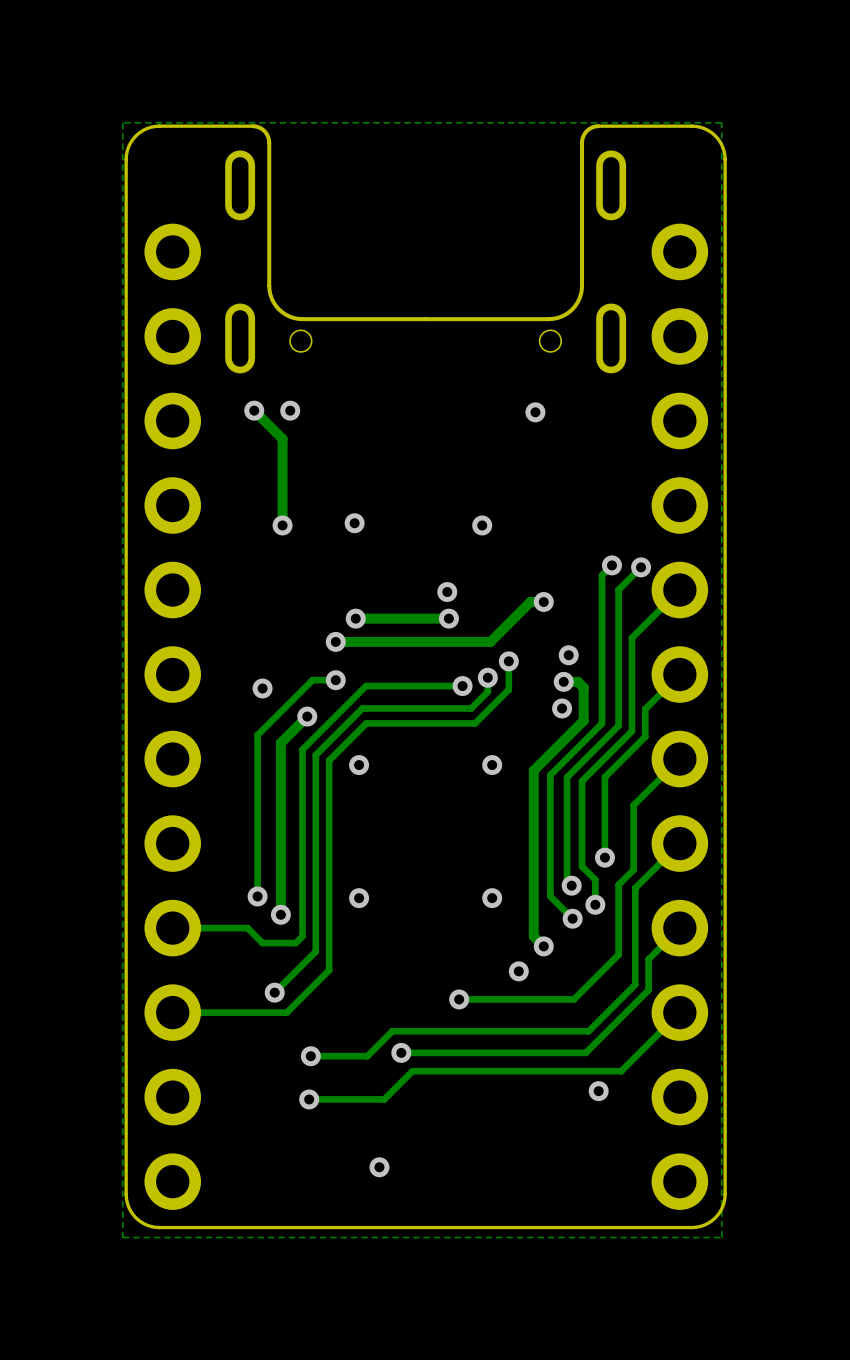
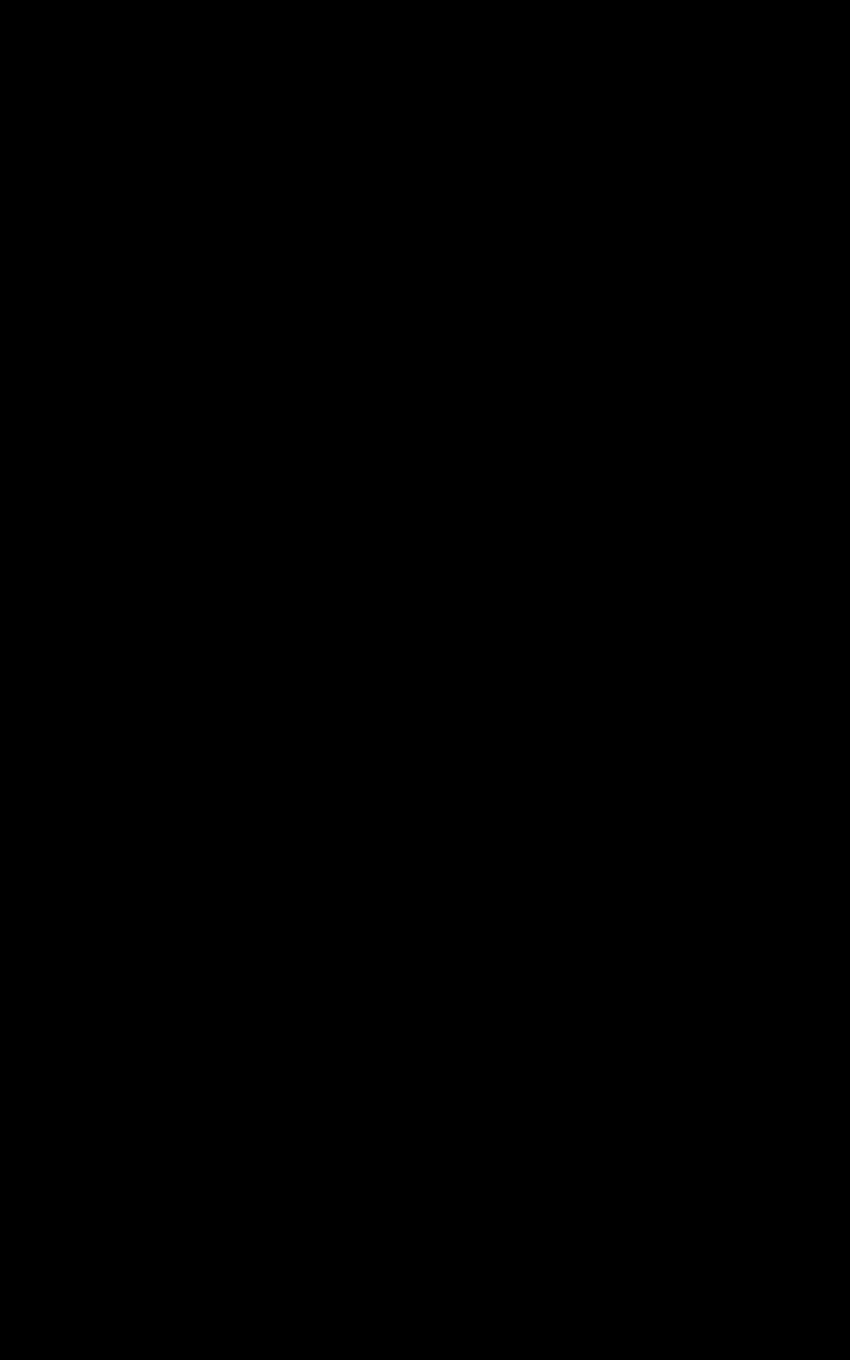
zone outline: (721, 122) (721, 1237) (122, 1237) (122, 122) (721, 122) -> none
board edge: (598, 126) (700, 127) (708, 130) (718, 139) (724, 155) (725, 1194) (722, 1207) (712, 1220) (704, 1225) (691, 1227) (155, 1227) (142, 1223) (133, 1214) (127, 1202) (126, 1194) (126, 155) (133, 139) (142, 130) (150, 127) (252, 126) -> none
part: (425, 248) -> none
track: (254, 410) (282, 438) (282, 525) -> none
via: (254, 410) -> none
via: (290, 410) -> none
via: (535, 412) -> none
via: (354, 523) -> none
via: (282, 525) -> none
via: (482, 525) -> none
track: (611, 565) (601, 575) (601, 723) (550, 775) (550, 896) (572, 918) -> none
via: (611, 565) -> none
track: (641, 567) (618, 589) (618, 725) (567, 777) (567, 881) (571, 885) -> none
via: (641, 567) -> none
track: (679, 590) (631, 637) (631, 731) (582, 781) (582, 866) (595, 879) (595, 904) -> none
via: (447, 592) -> none
track: (543, 601) (530, 601) (490, 641) (335, 641) -> none
via: (543, 601) -> none
via: (355, 618) -> none
track: (448, 618) (355, 618) -> none
via: (448, 618) -> none
via: (335, 641) -> none
via: (568, 655) -> none
track: (508, 661) (508, 689) (475, 723) (366, 723) (329, 760) (329, 970) (286, 1012) (172, 1012) -> none
via: (508, 661) -> none
track: (679, 674) (645, 709) (645, 736) (604, 777) (604, 857) -> none
track: (487, 677) (487, 691) (471, 708) (362, 708) (315, 755) (315, 951) (274, 992) -> none
via: (487, 677) -> none
track: (335, 680) (312, 680) (257, 735) (257, 896) -> none
via: (335, 680) -> none
track: (563, 681) (577, 681) (583, 687) (583, 720) (533, 770) (533, 936) (543, 946) -> none
via: (563, 681) -> none
track: (462, 686) (366, 686) (302, 749) (302, 936) (295, 943) (262, 943) (247, 928) (172, 928) -> none
via: (462, 686) -> none
via: (262, 688) -> none
via: (562, 708) -> none
part: (172, 716) -> none
track: (307, 716) (280, 742) (280, 914) -> none
via: (307, 716) -> none
part: (679, 716) -> none
track: (679, 759) (633, 805) (633, 869) (618, 884) (618, 954) (573, 999) (459, 999) -> none
via: (359, 765) -> none
via: (492, 765) -> none
track: (679, 843) (635, 888) (635, 984) (588, 1031) (392, 1031) (367, 1056) (310, 1056) -> none
via: (604, 857) -> none
via: (571, 885) -> none
via: (257, 896) -> none
via: (359, 898) -> none
via: (492, 898) -> none
via: (595, 904) -> none
via: (280, 914) -> none
via: (572, 918) -> none
track: (679, 928) (648, 959) (648, 990) (585, 1052) (401, 1052) -> none
via: (543, 946) -> none
via: (518, 971) -> none
via: (274, 992) -> none
via: (459, 999) -> none
track: (679, 1012) (621, 1071) (412, 1071) (384, 1099) (309, 1099) -> none
via: (401, 1052) -> none
via: (310, 1056) -> none
via: (598, 1091) -> none
via: (309, 1099) -> none
via: (379, 1167) -> none

